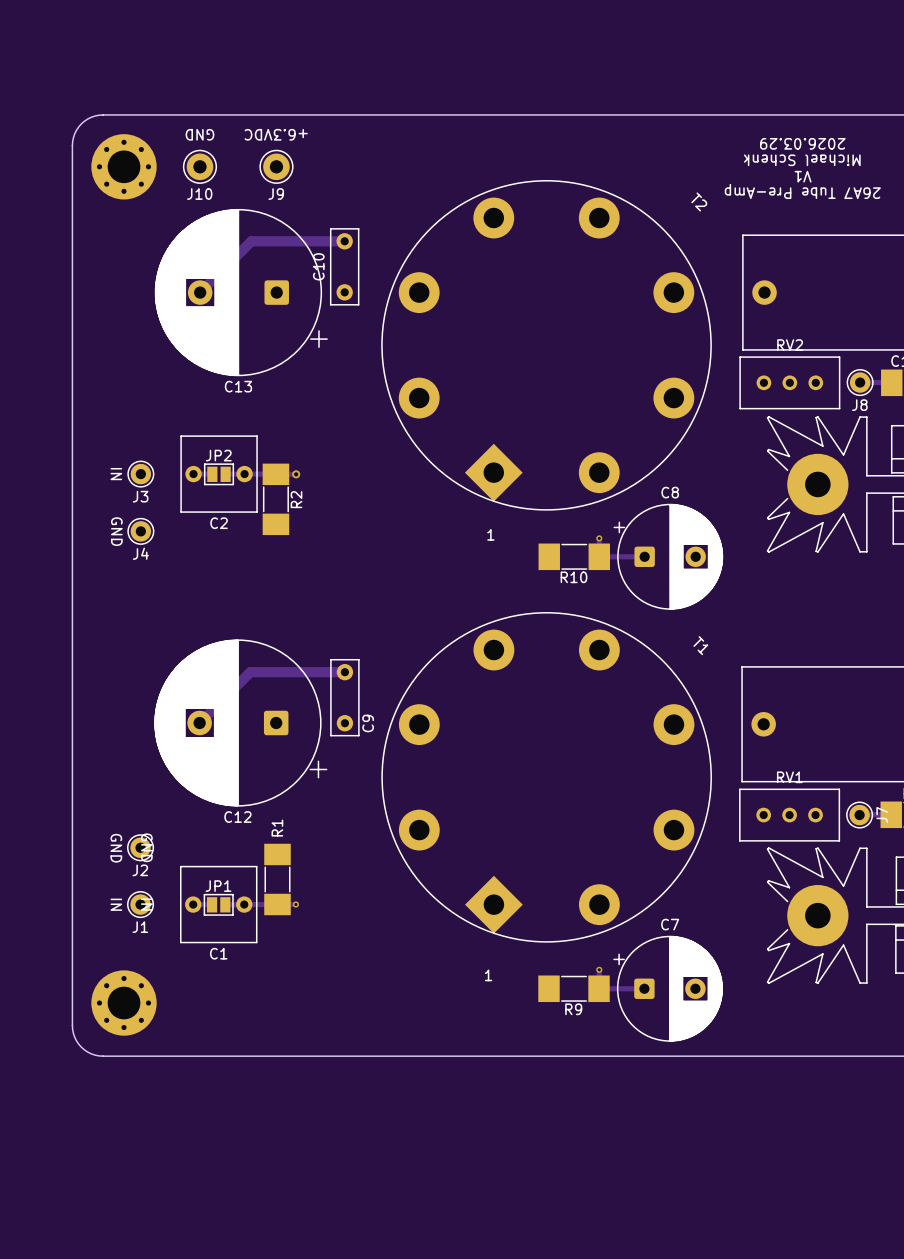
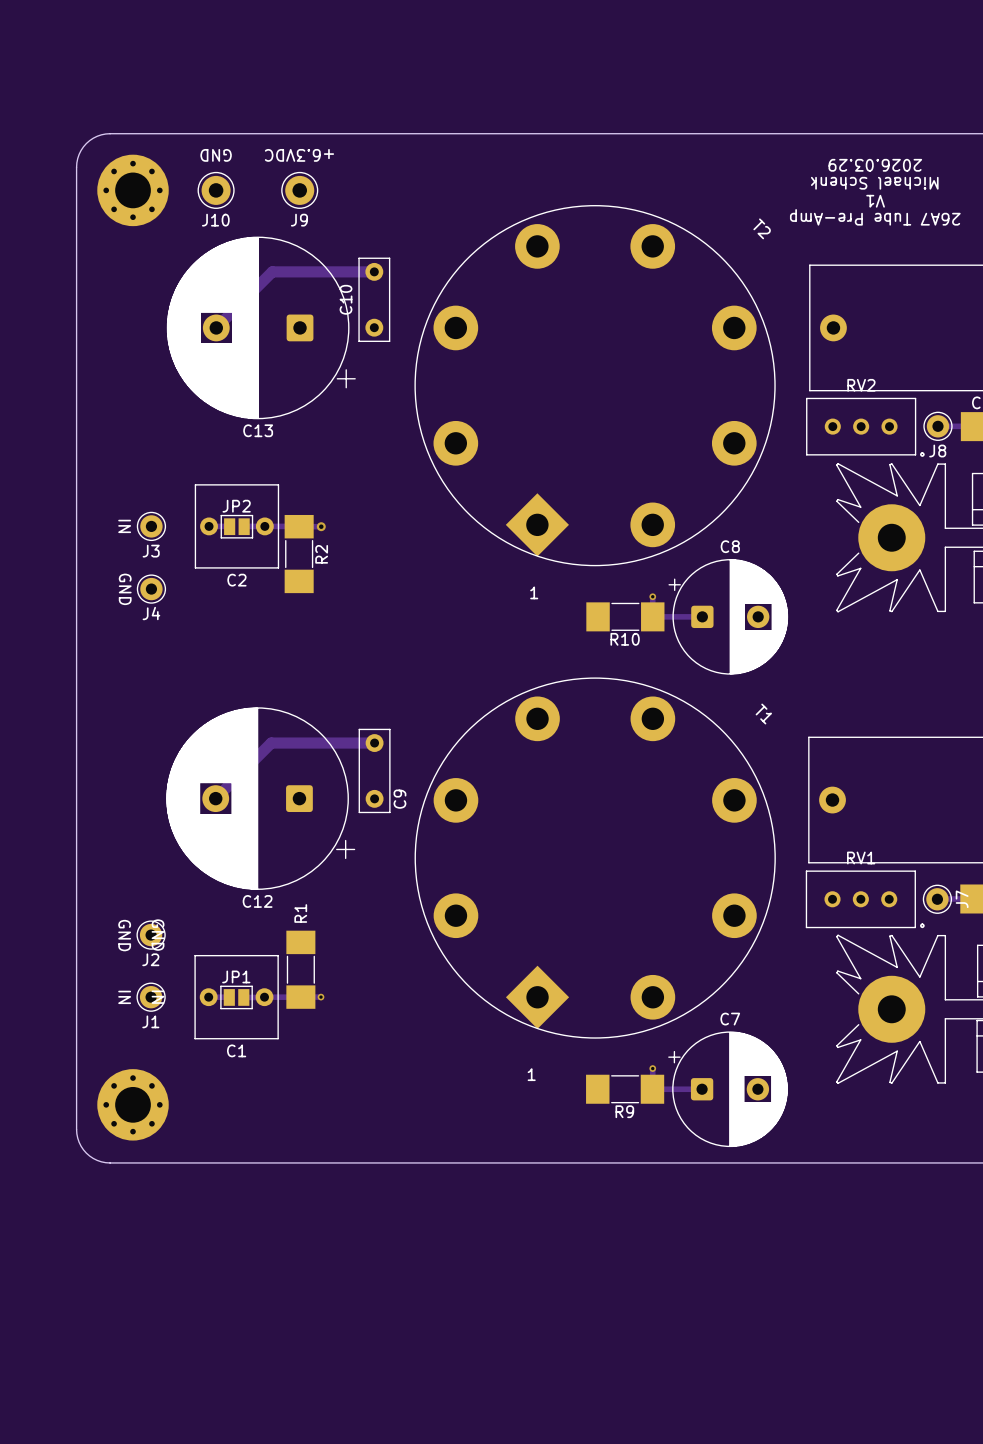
text: none -> ° (922, 454)
text: none -> ° (922, 925)

